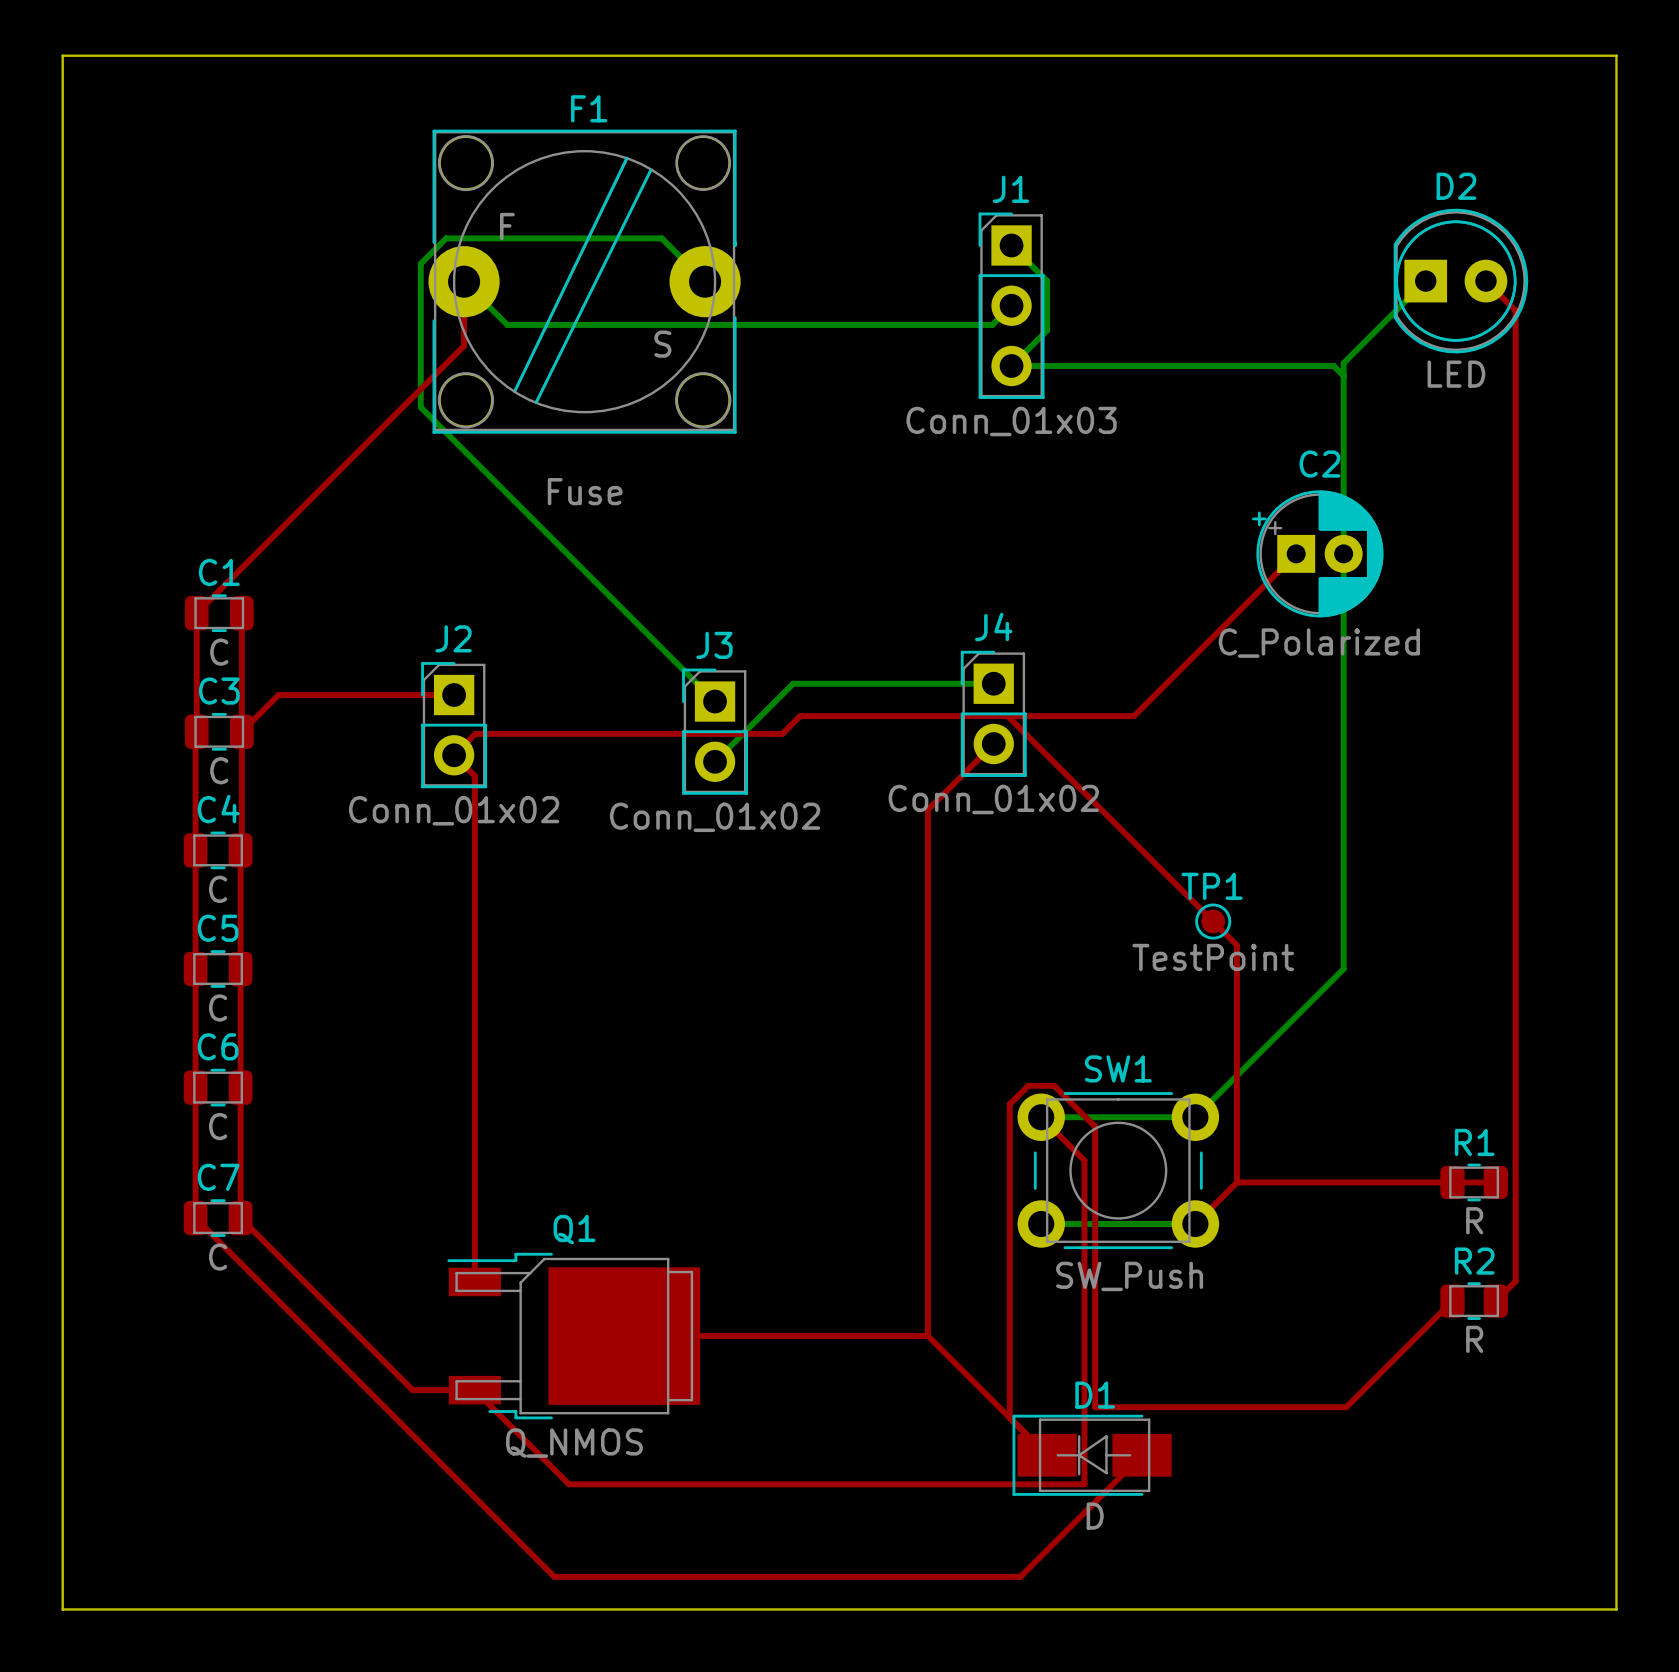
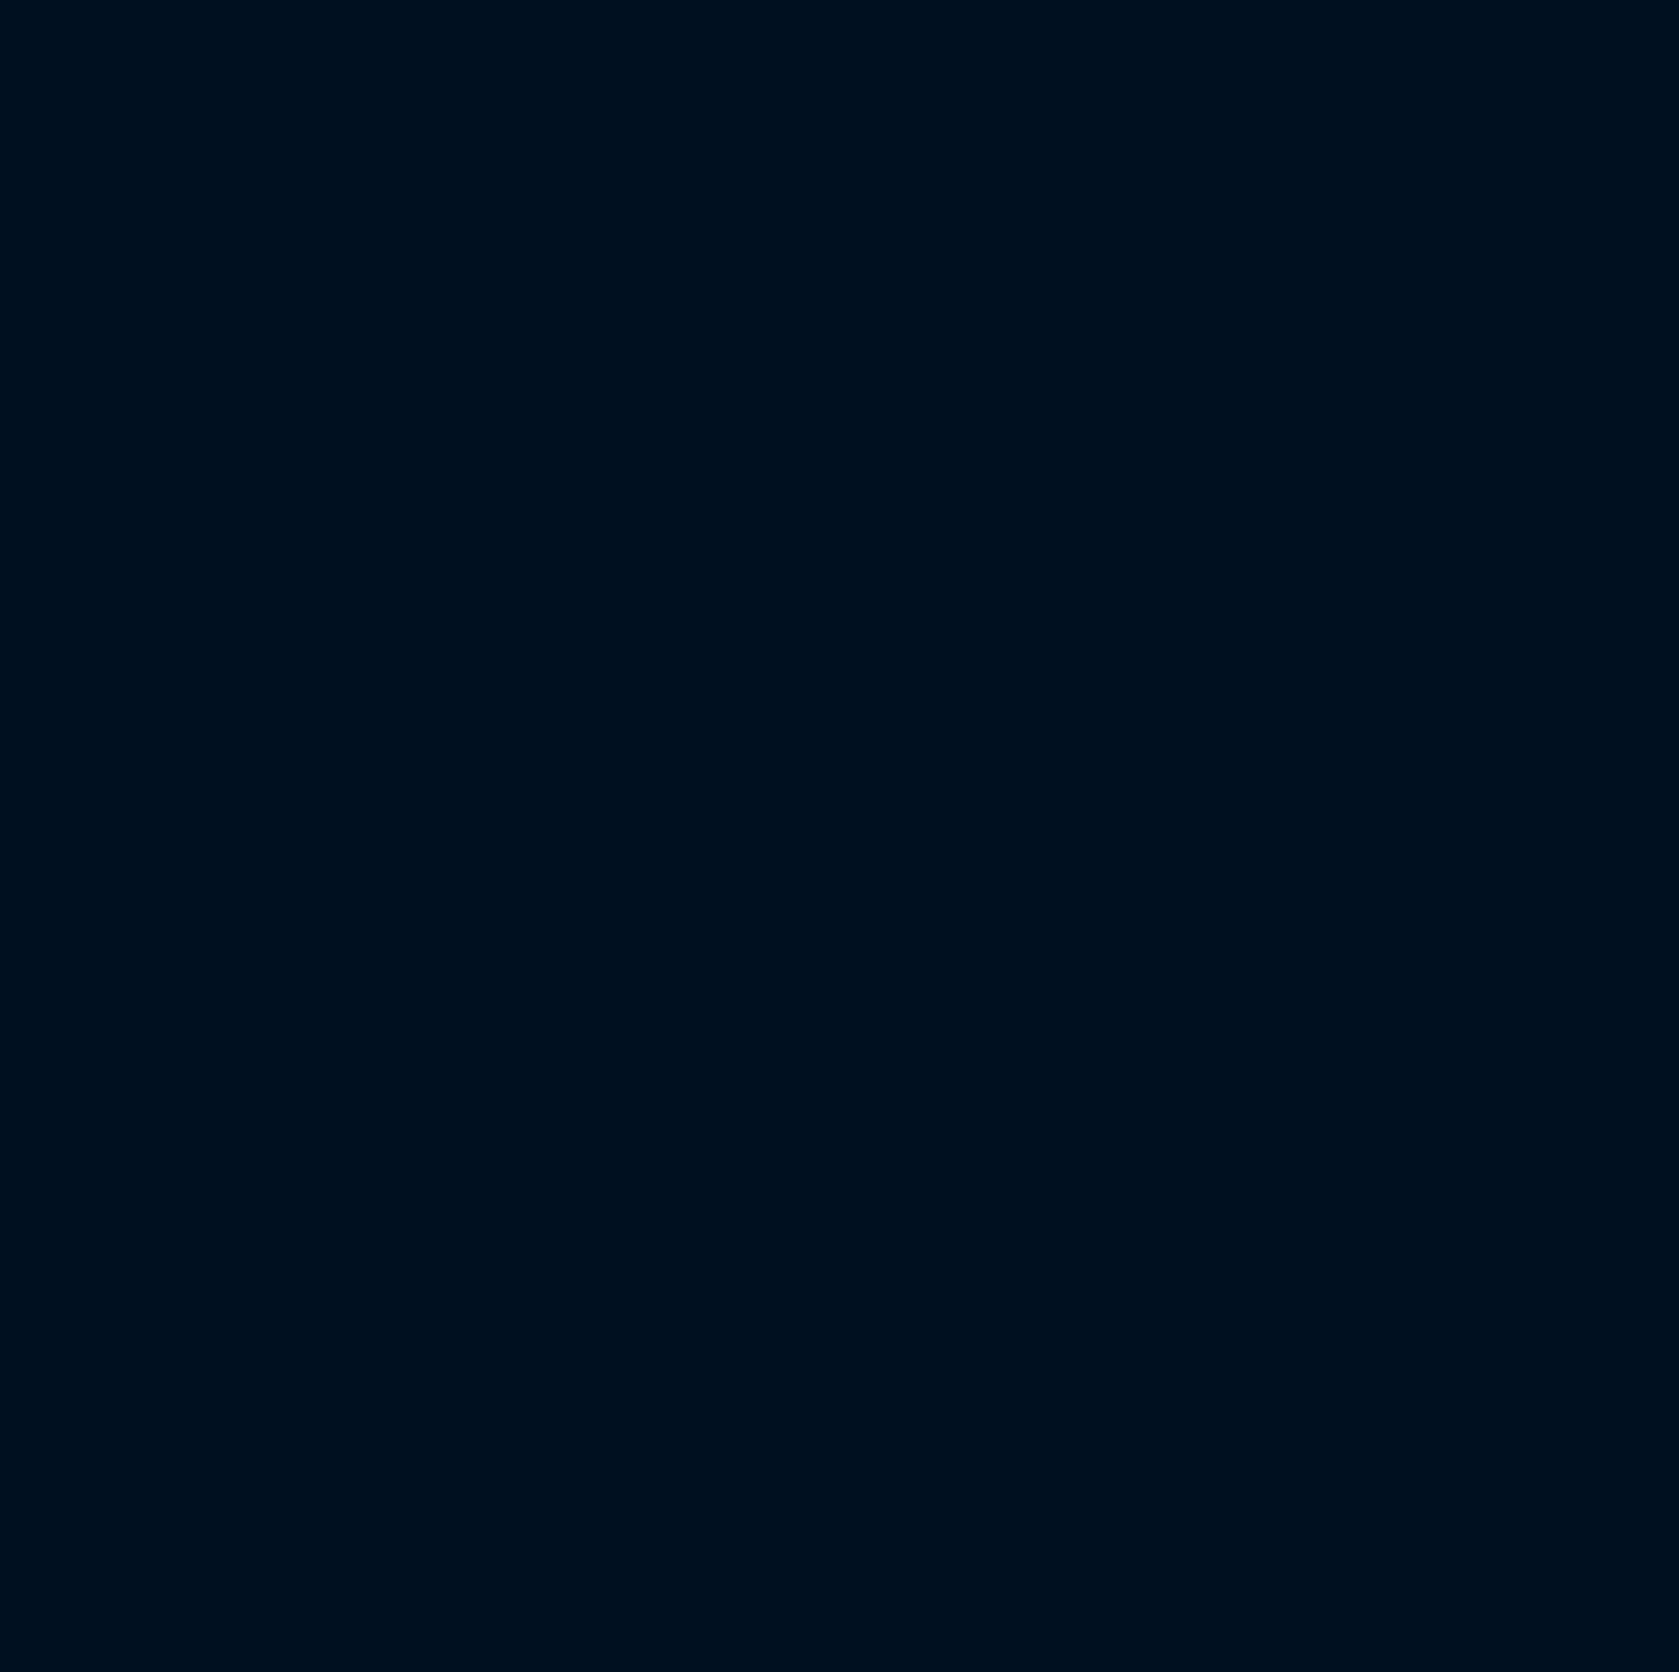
board edge: (62, 55) (1616, 55) (1616, 1609) (62, 1609) (62, 55) -> none
bottom track: (1011, 245) (1047, 281) (1047, 330) (1011, 366) (1333, 366) (1343, 375) -> none
top track: (464, 281) (464, 345) (196, 613) (195, 1218) (554, 1576) (1020, 1576) (1142, 1455) -> none
bottom track: (464, 281) (507, 324) (992, 324) (1011, 305) -> none
F1: Fuse (584, 281) -> none
bottom track: (705, 281) (661, 238) (446, 238) (420, 263) (420, 407) (715, 701) -> none
bottom track: (1425, 281) (1343, 363) (1343, 968) (1195, 1117) (1041, 1117) -> none
D2: LED (1460, 281) -> none
top track: (1485, 281) (1515, 310) (1515, 1281) (1495, 1301) -> none
J1: Conn_01x03 (1011, 305) -> none
top track: (1296, 553) (1133, 716) (800, 716) (782, 733) (475, 733) (454, 755) (474, 776) (474, 1282) -> none
C2: C_Polarized (1317, 553) -> none
C1: C (219, 613) -> none
top track: (241, 613) (240, 1218) (412, 1390) (474, 1390) (569, 1484) (1084, 1484) (1084, 1160) (1041, 1117) -> none
bottom track: (993, 683) (793, 683) (715, 761) -> none
top track: (454, 695) (278, 695) (241, 731) -> none
J4: Conn_01x02 (993, 713) -> none
top track: (1007, 716) (1236, 945) (1236, 1182) -> none
J2: Conn_01x02 (454, 725) -> none
C3: C (219, 731) -> none
J3: Conn_01x02 (715, 731) -> none
top track: (993, 744) (927, 809) (927, 1336) -> none
C4: C (218, 850) -> none
TP1: TestPoint (1213, 921) -> none
C5: C (218, 968) -> none
C6: C (218, 1087) -> none
SW1: SW_Push (1118, 1170) -> none
top track: (1236, 1182) (1495, 1182) -> none
top track: (1236, 1182) (1195, 1224) -> none
R1: R (1474, 1182) -> none
C7: C (218, 1218) -> none
bottom track: (1041, 1224) (1195, 1224) -> none
top track: (1452, 1301) (1346, 1407) (1095, 1407) (1095, 1126) (1054, 1085) (1028, 1085) (1009, 1104) (1009, 1417) -> none
R2: R (1474, 1301) -> none
Q1: Q_NMOS (573, 1336) -> none
top track: (624, 1336) (927, 1336) -> none
top track: (927, 1336) (1047, 1455) -> none
D1: D (1092, 1455) -> none

